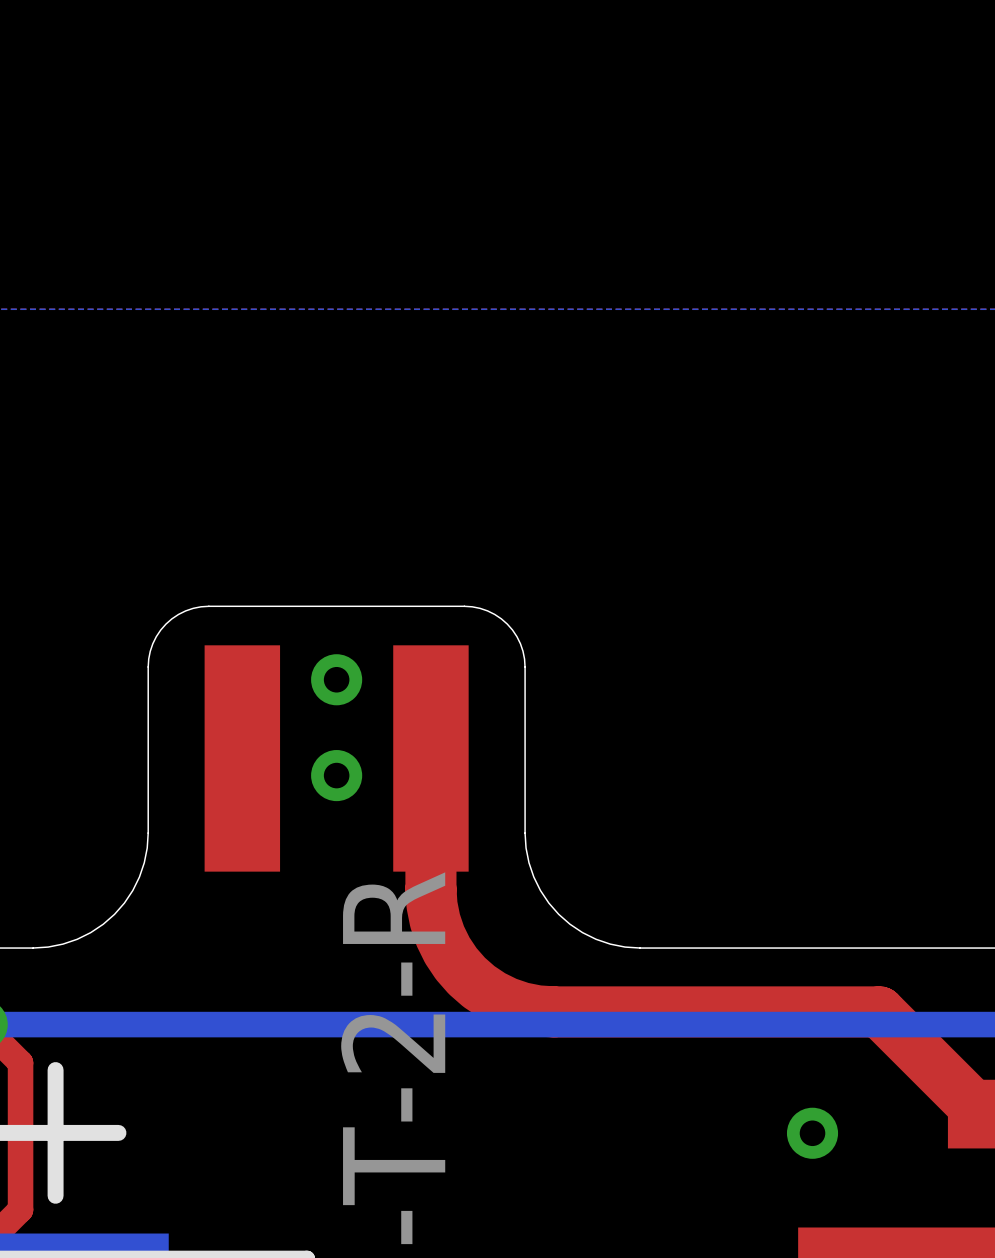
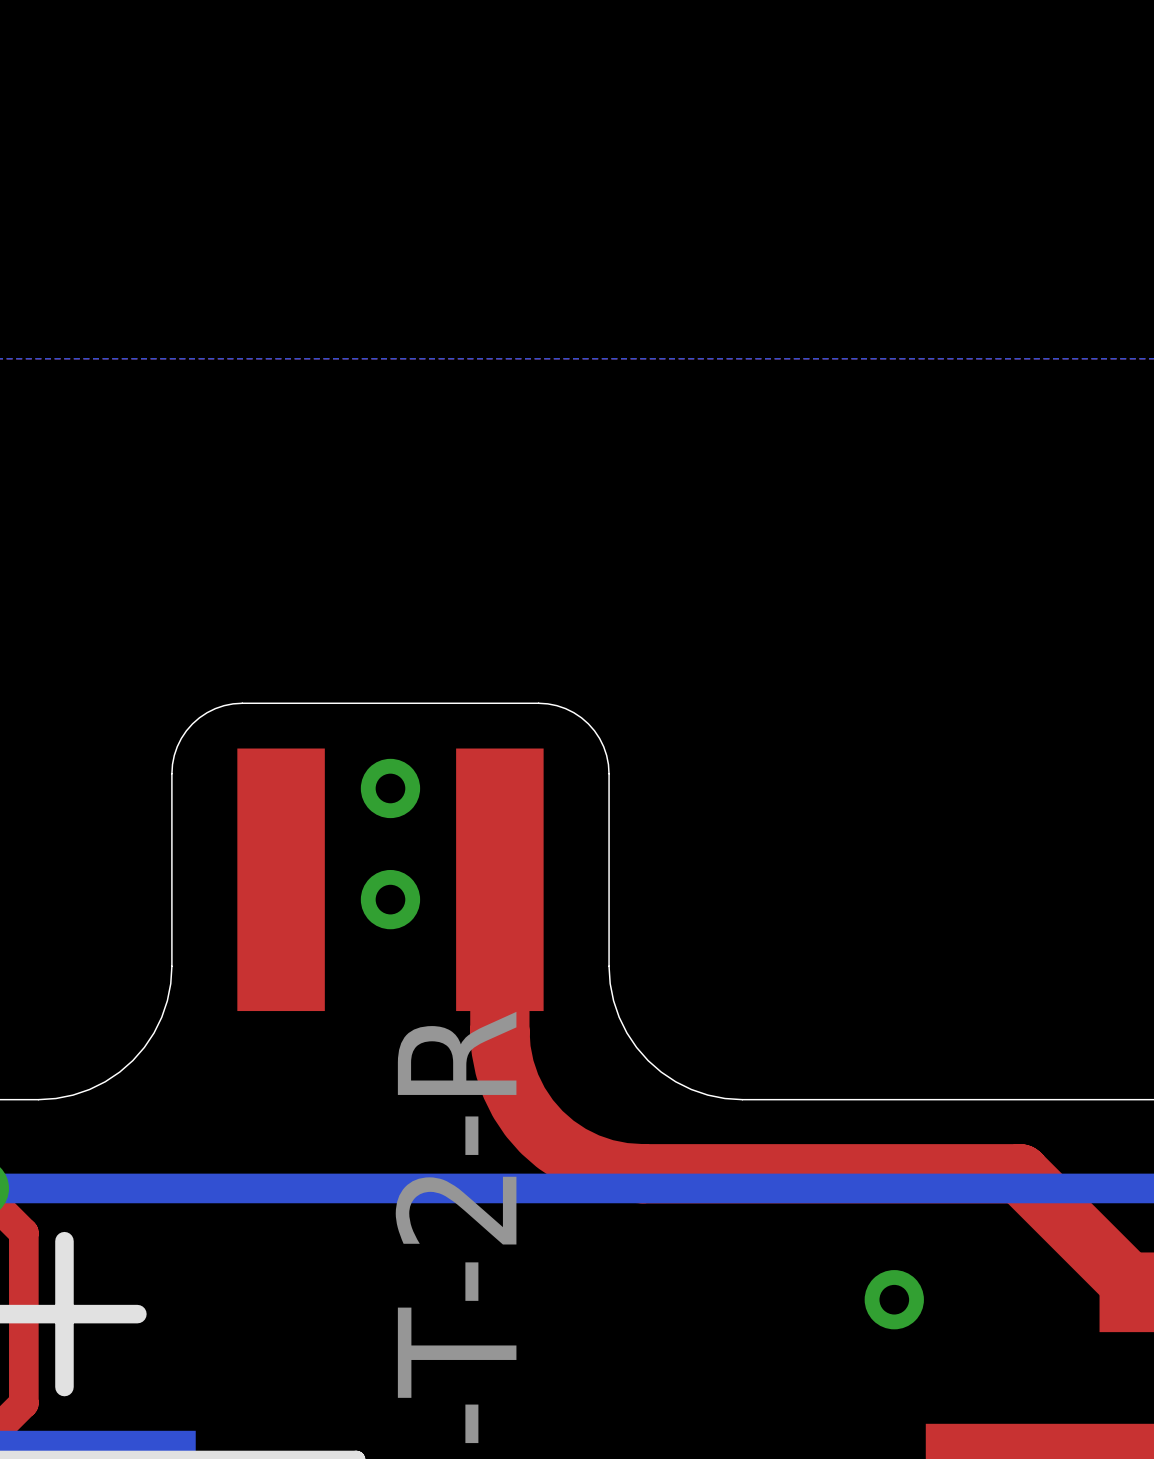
via position: (812, 1133) -> (894, 1299)

